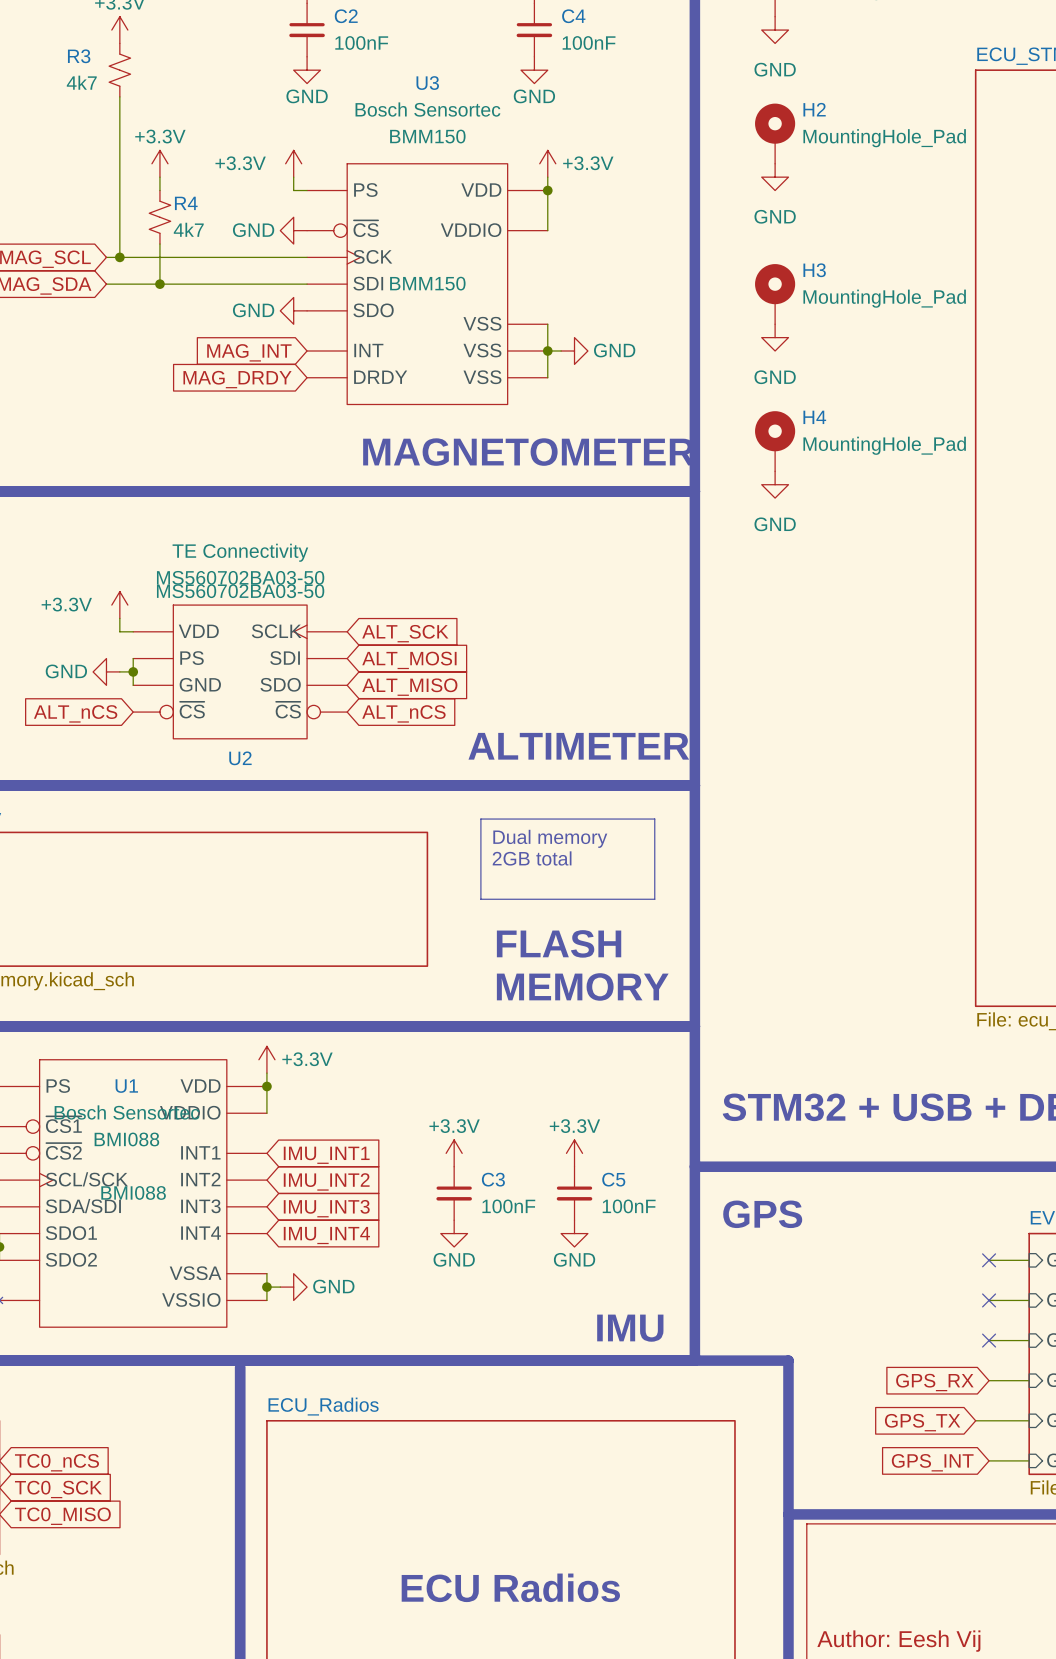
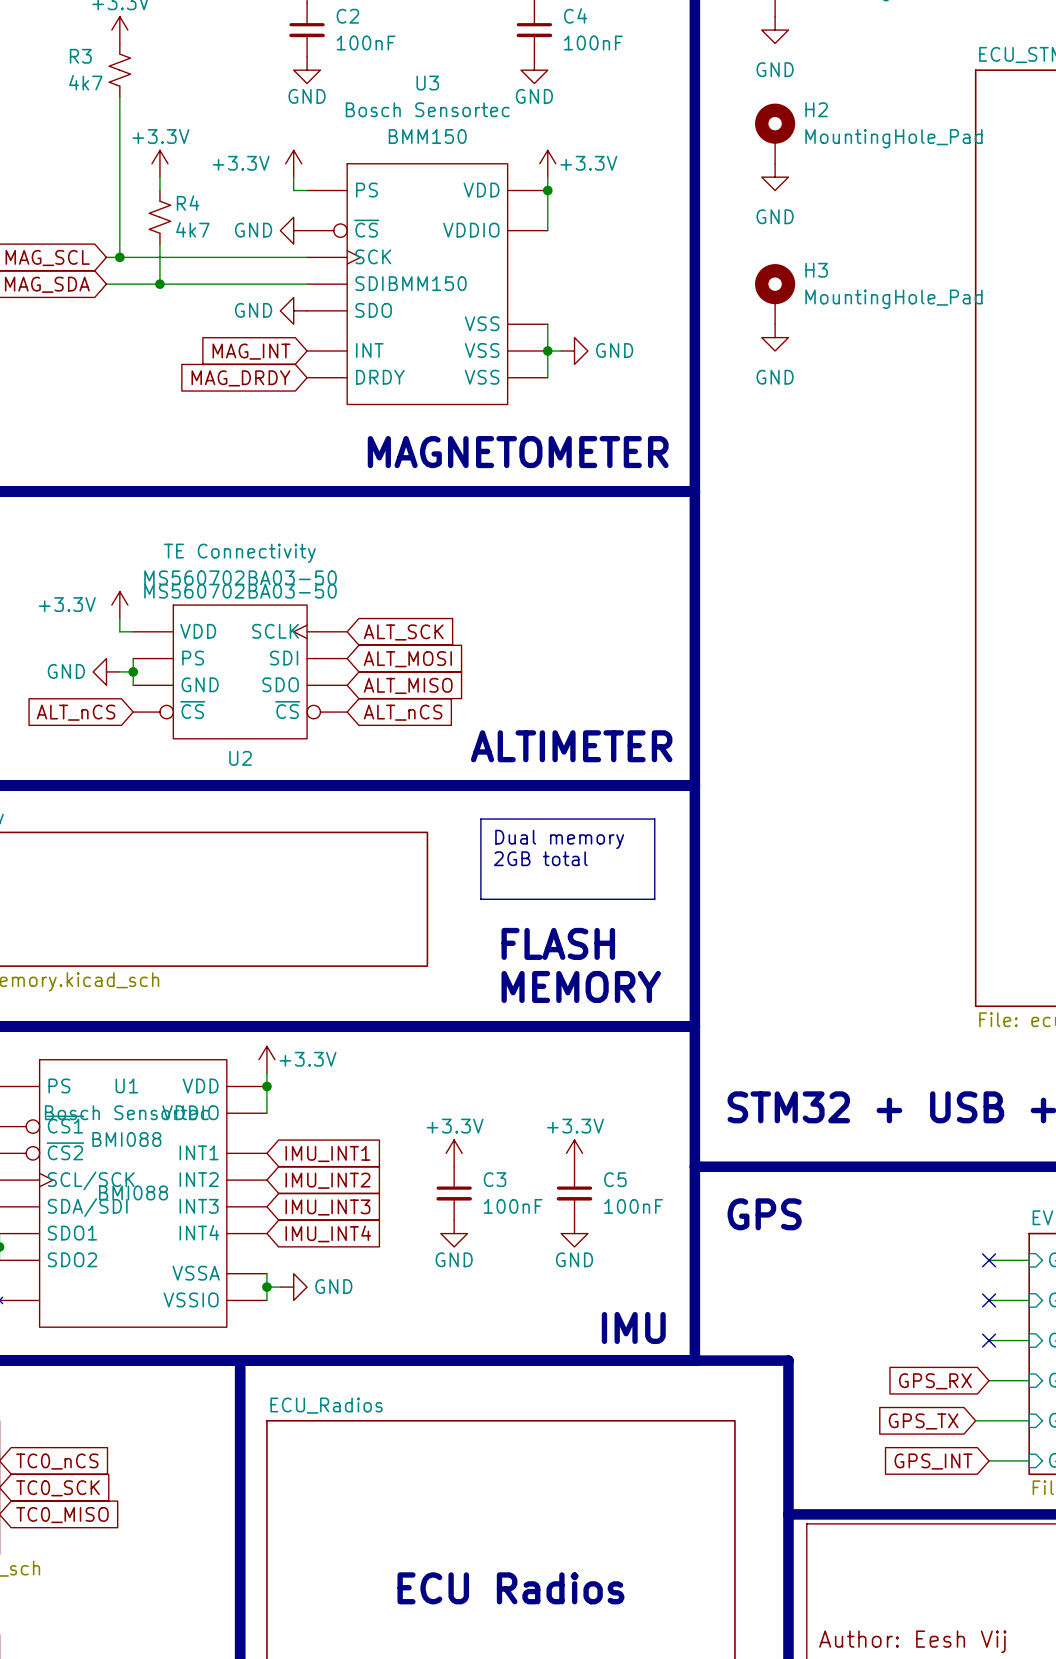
H4: MountingHole_Pad (775, 441) -> none
power symbol: GND (775, 484) -> none

